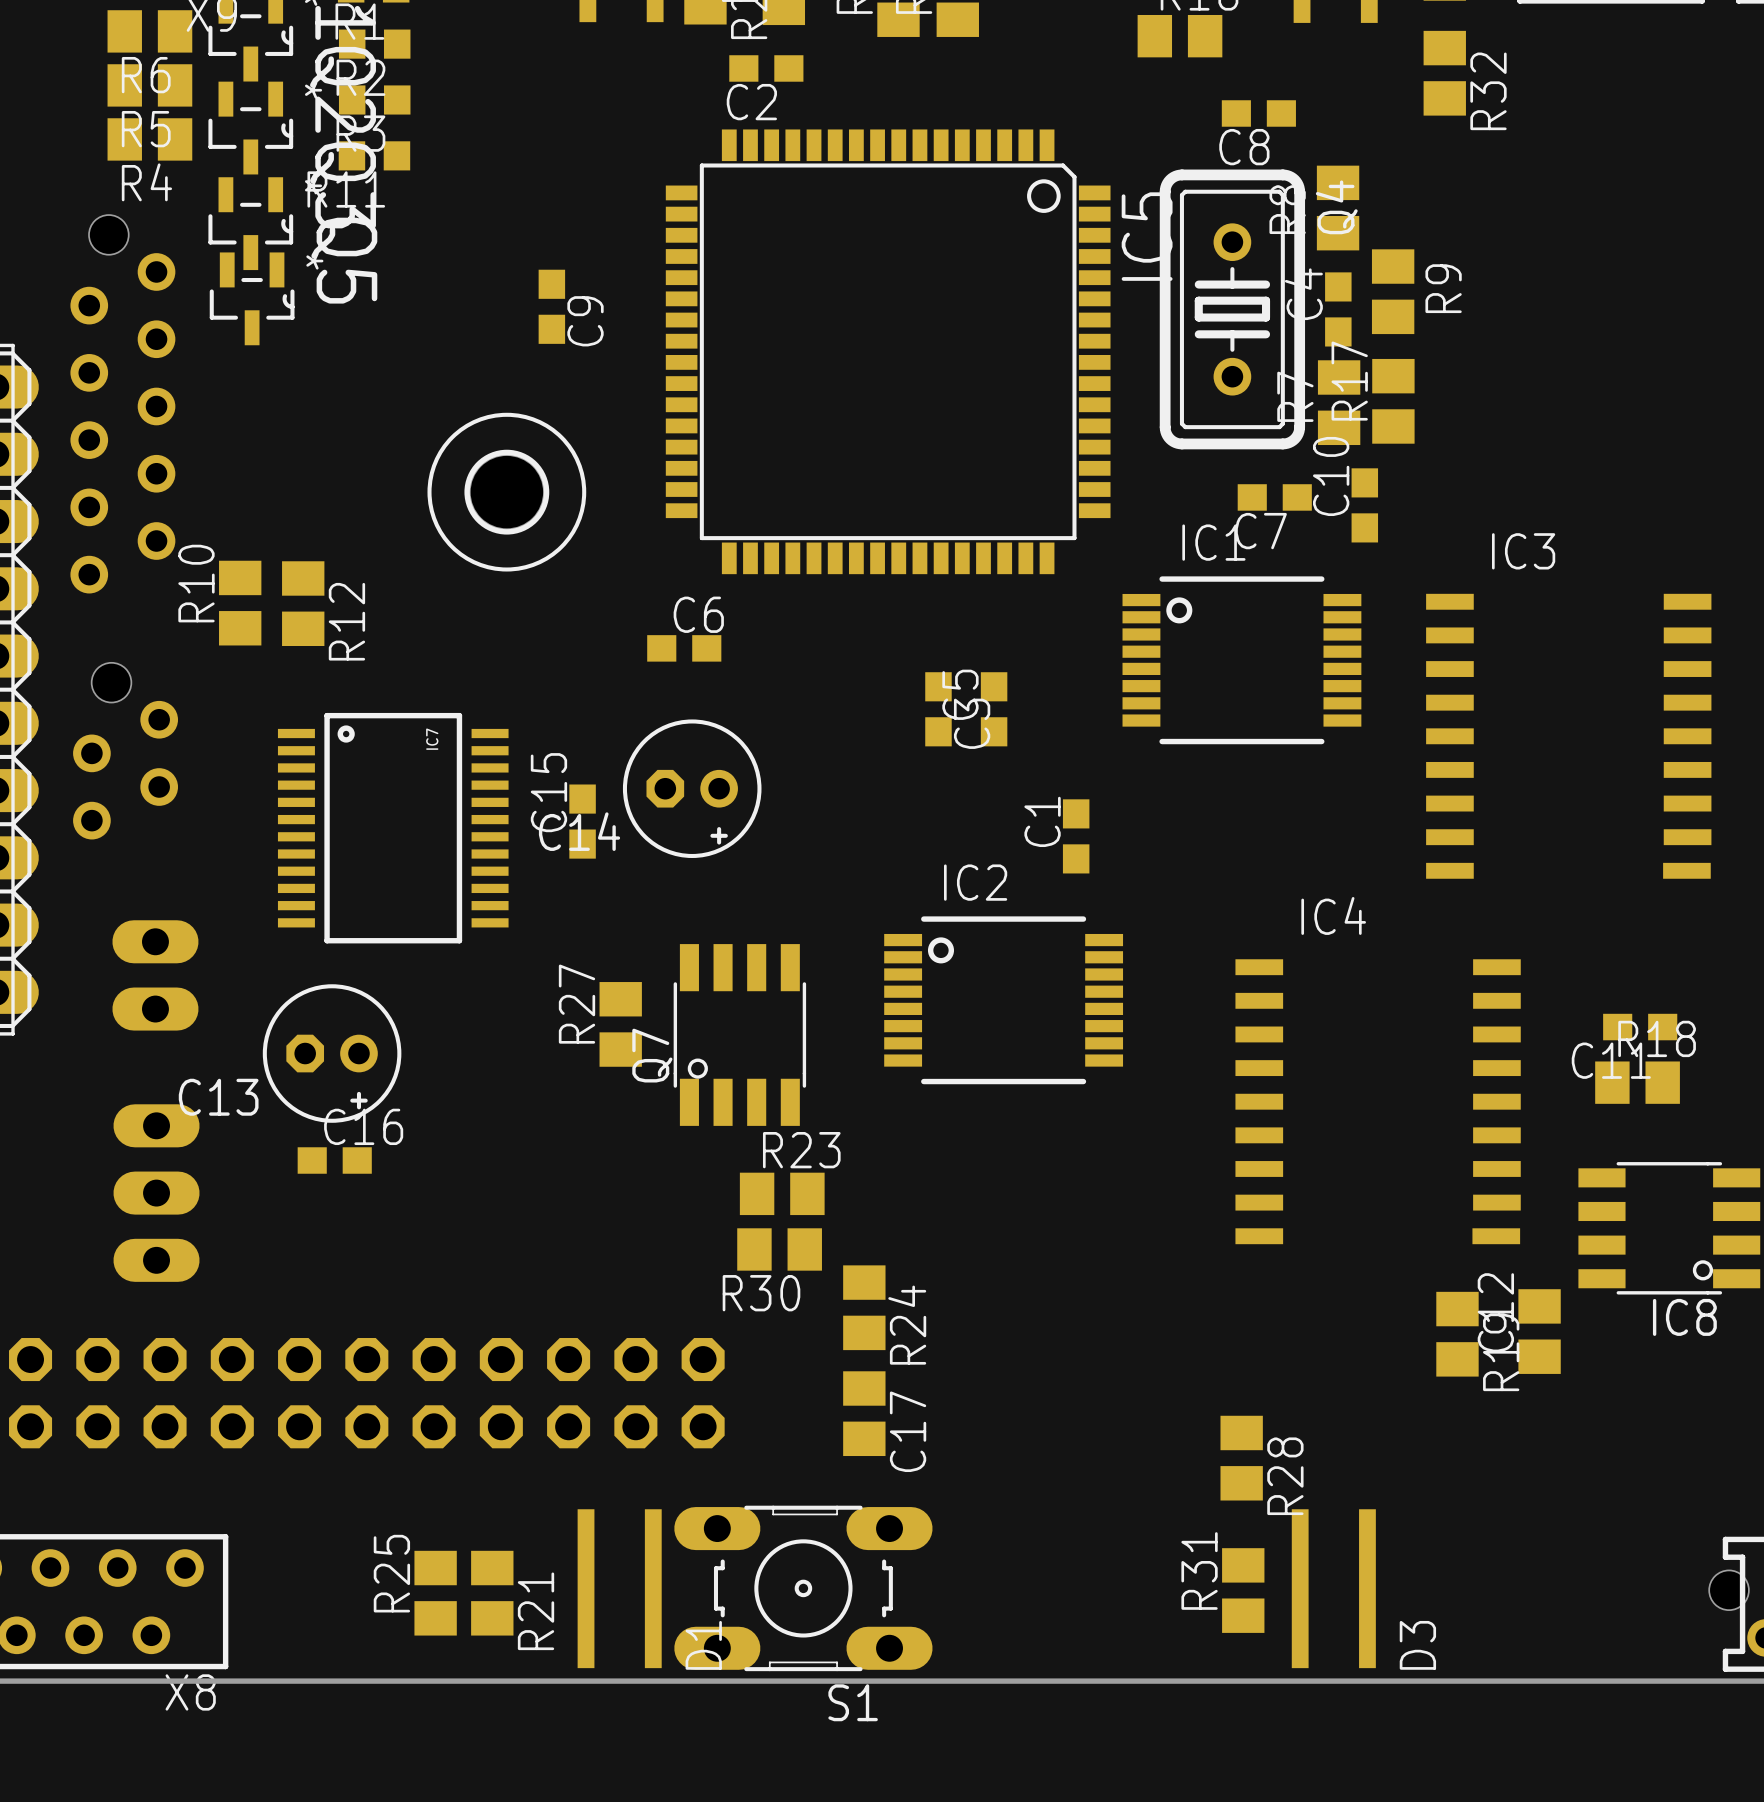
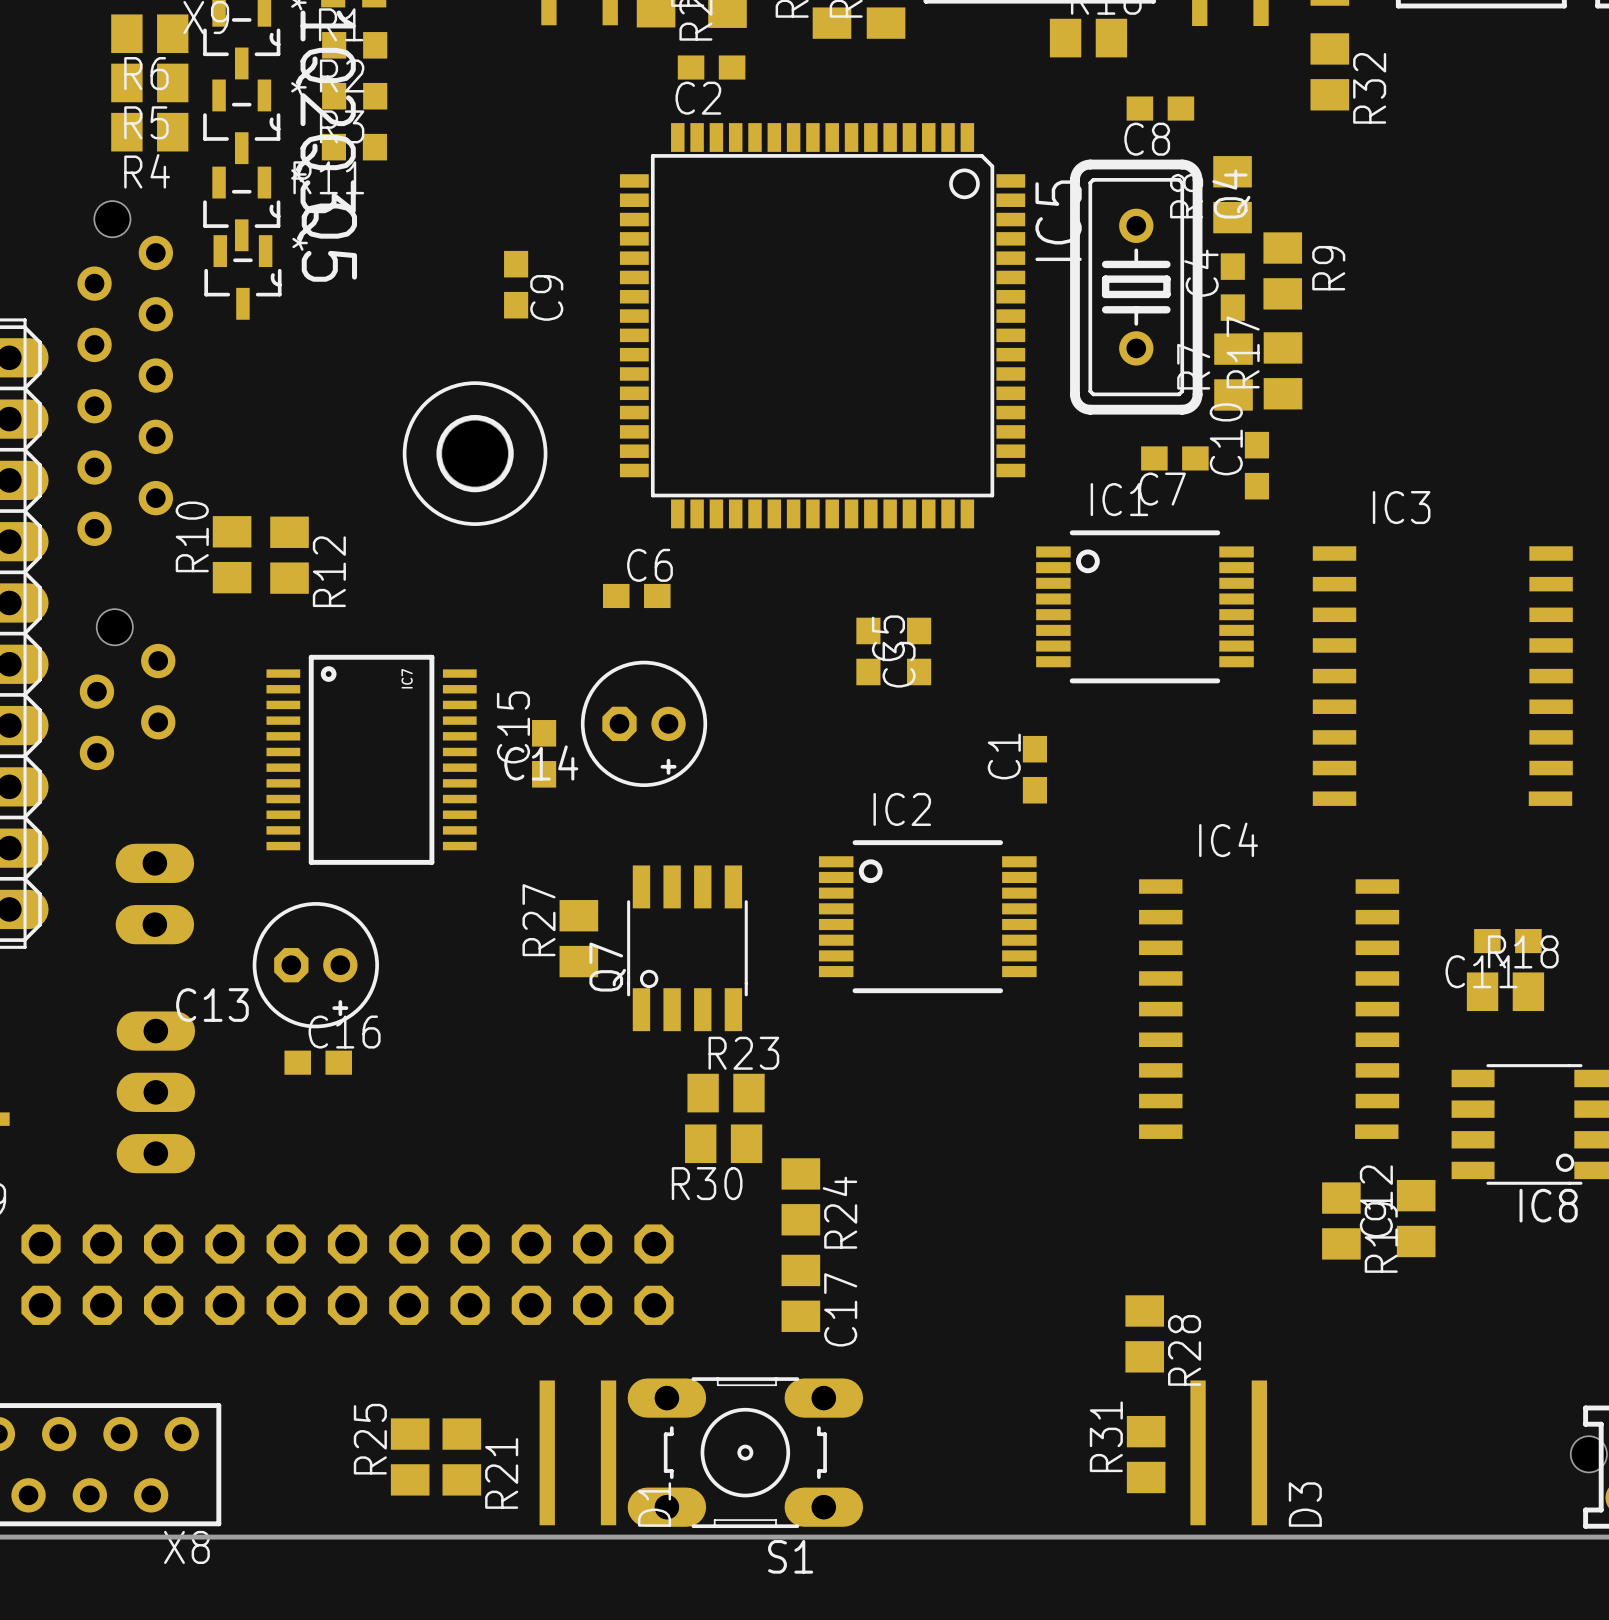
C1 position: (1076, 836) -> (1034, 769)

